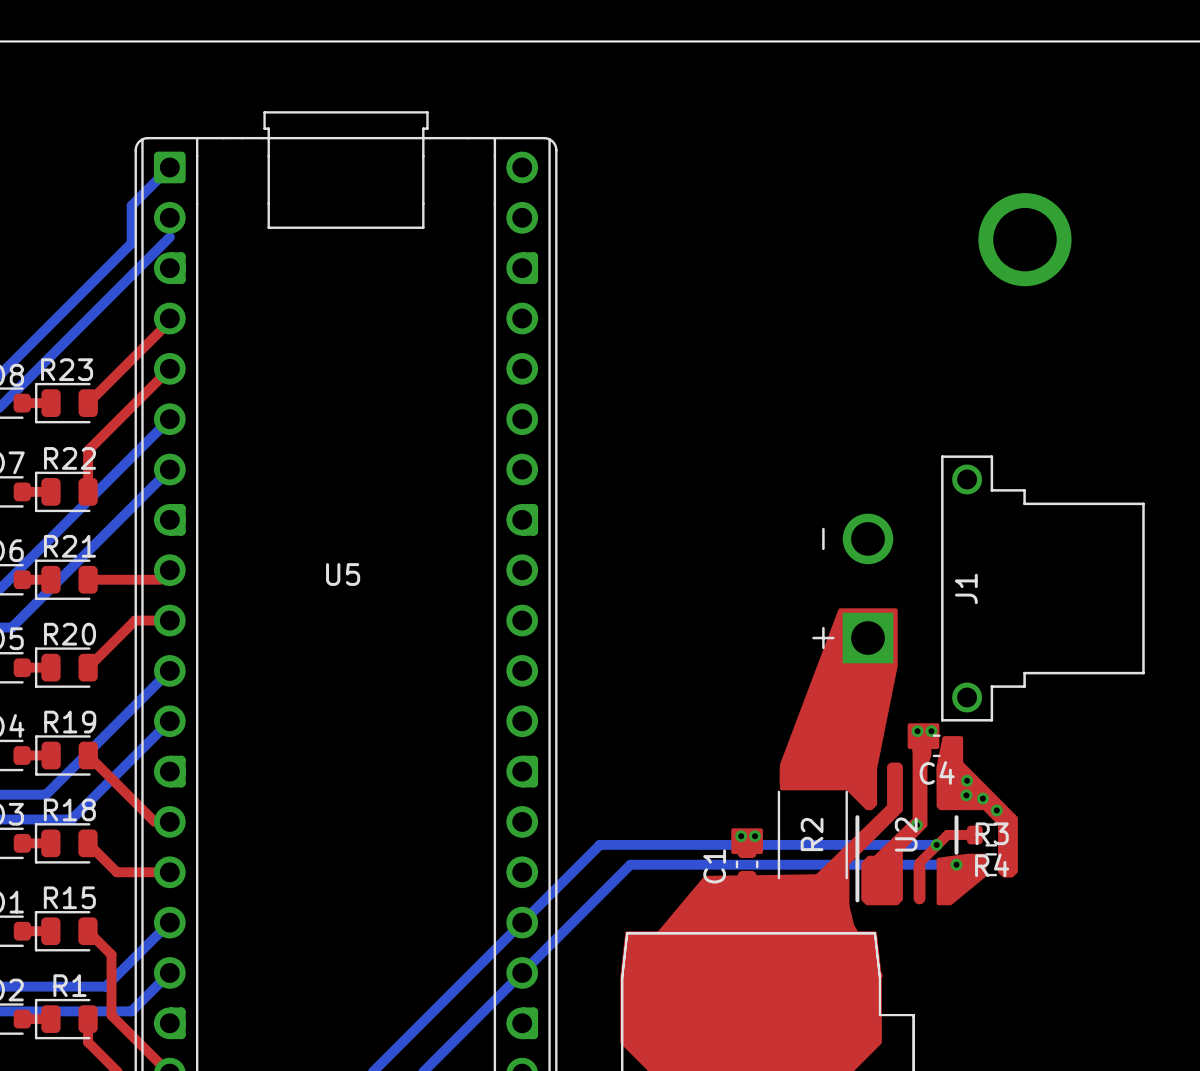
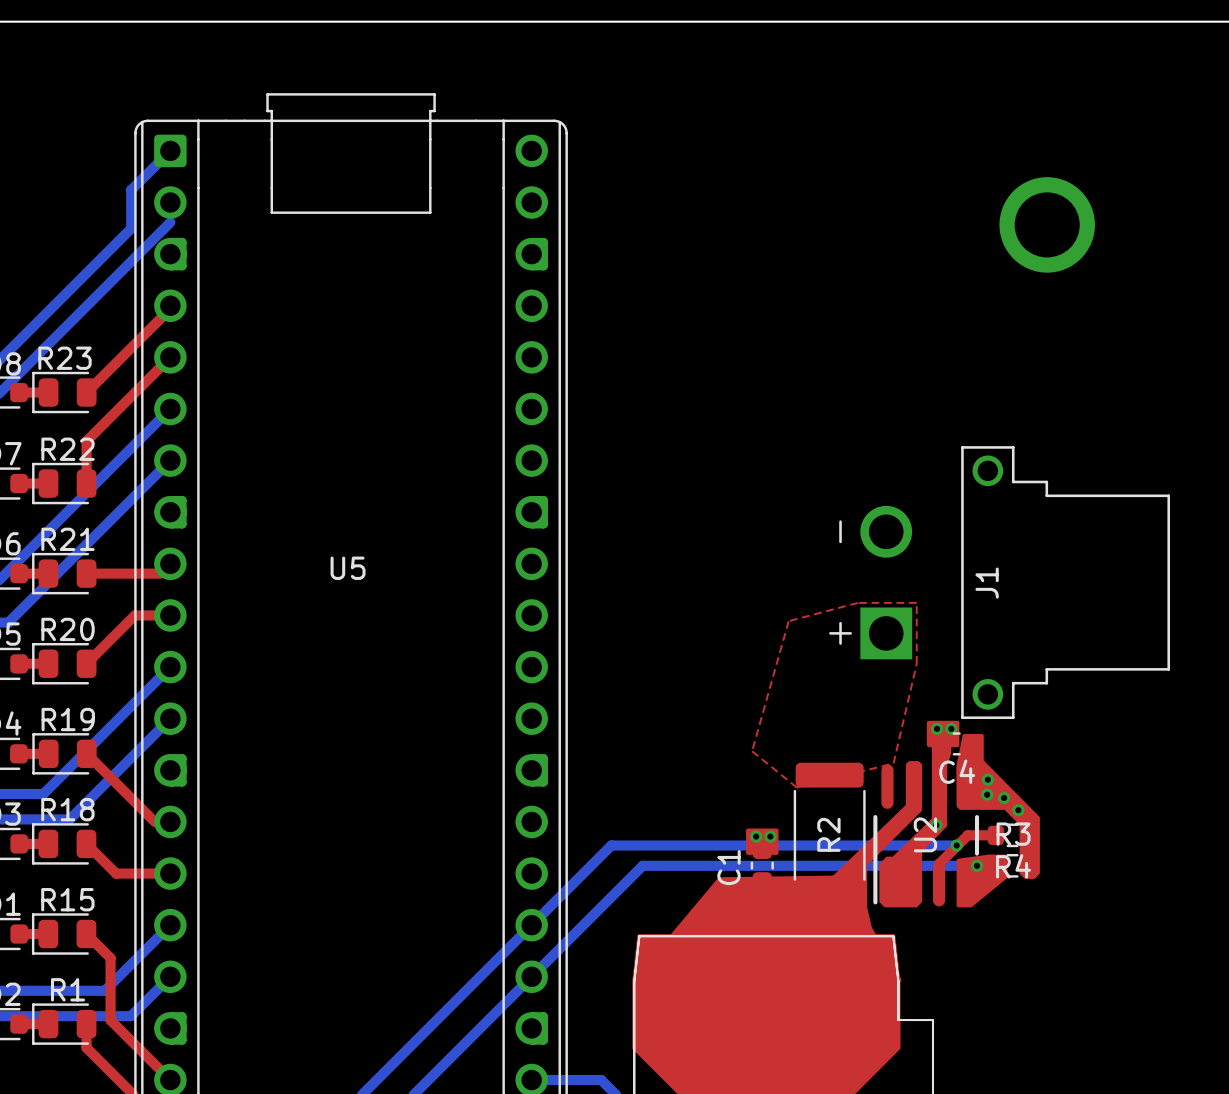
drawing: [780, 608, 898, 811] -> none
top zone outline: none -> (857, 602) (916, 602) (916, 663) (893, 763) (796, 787) (752, 751) (788, 621) (857, 602)

